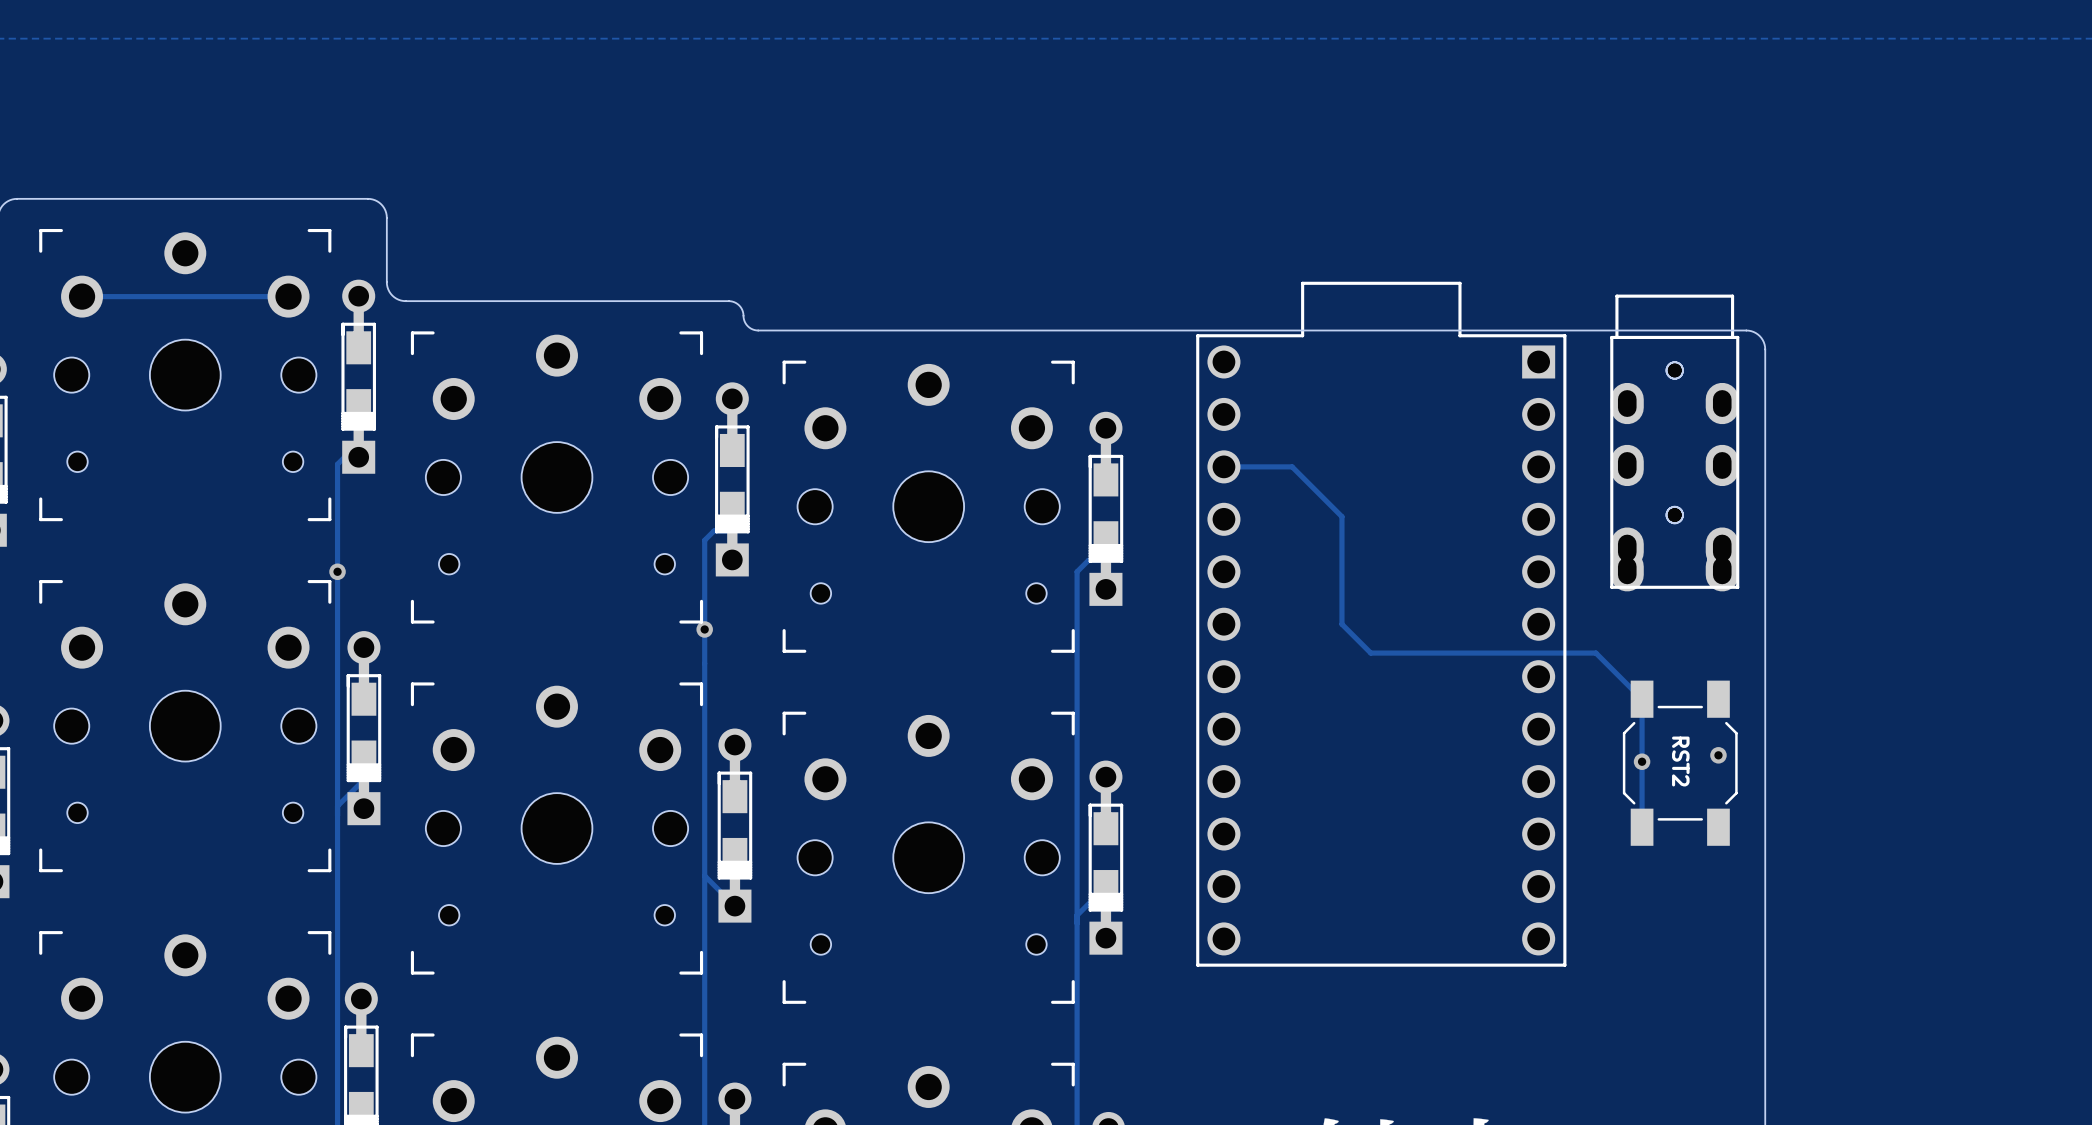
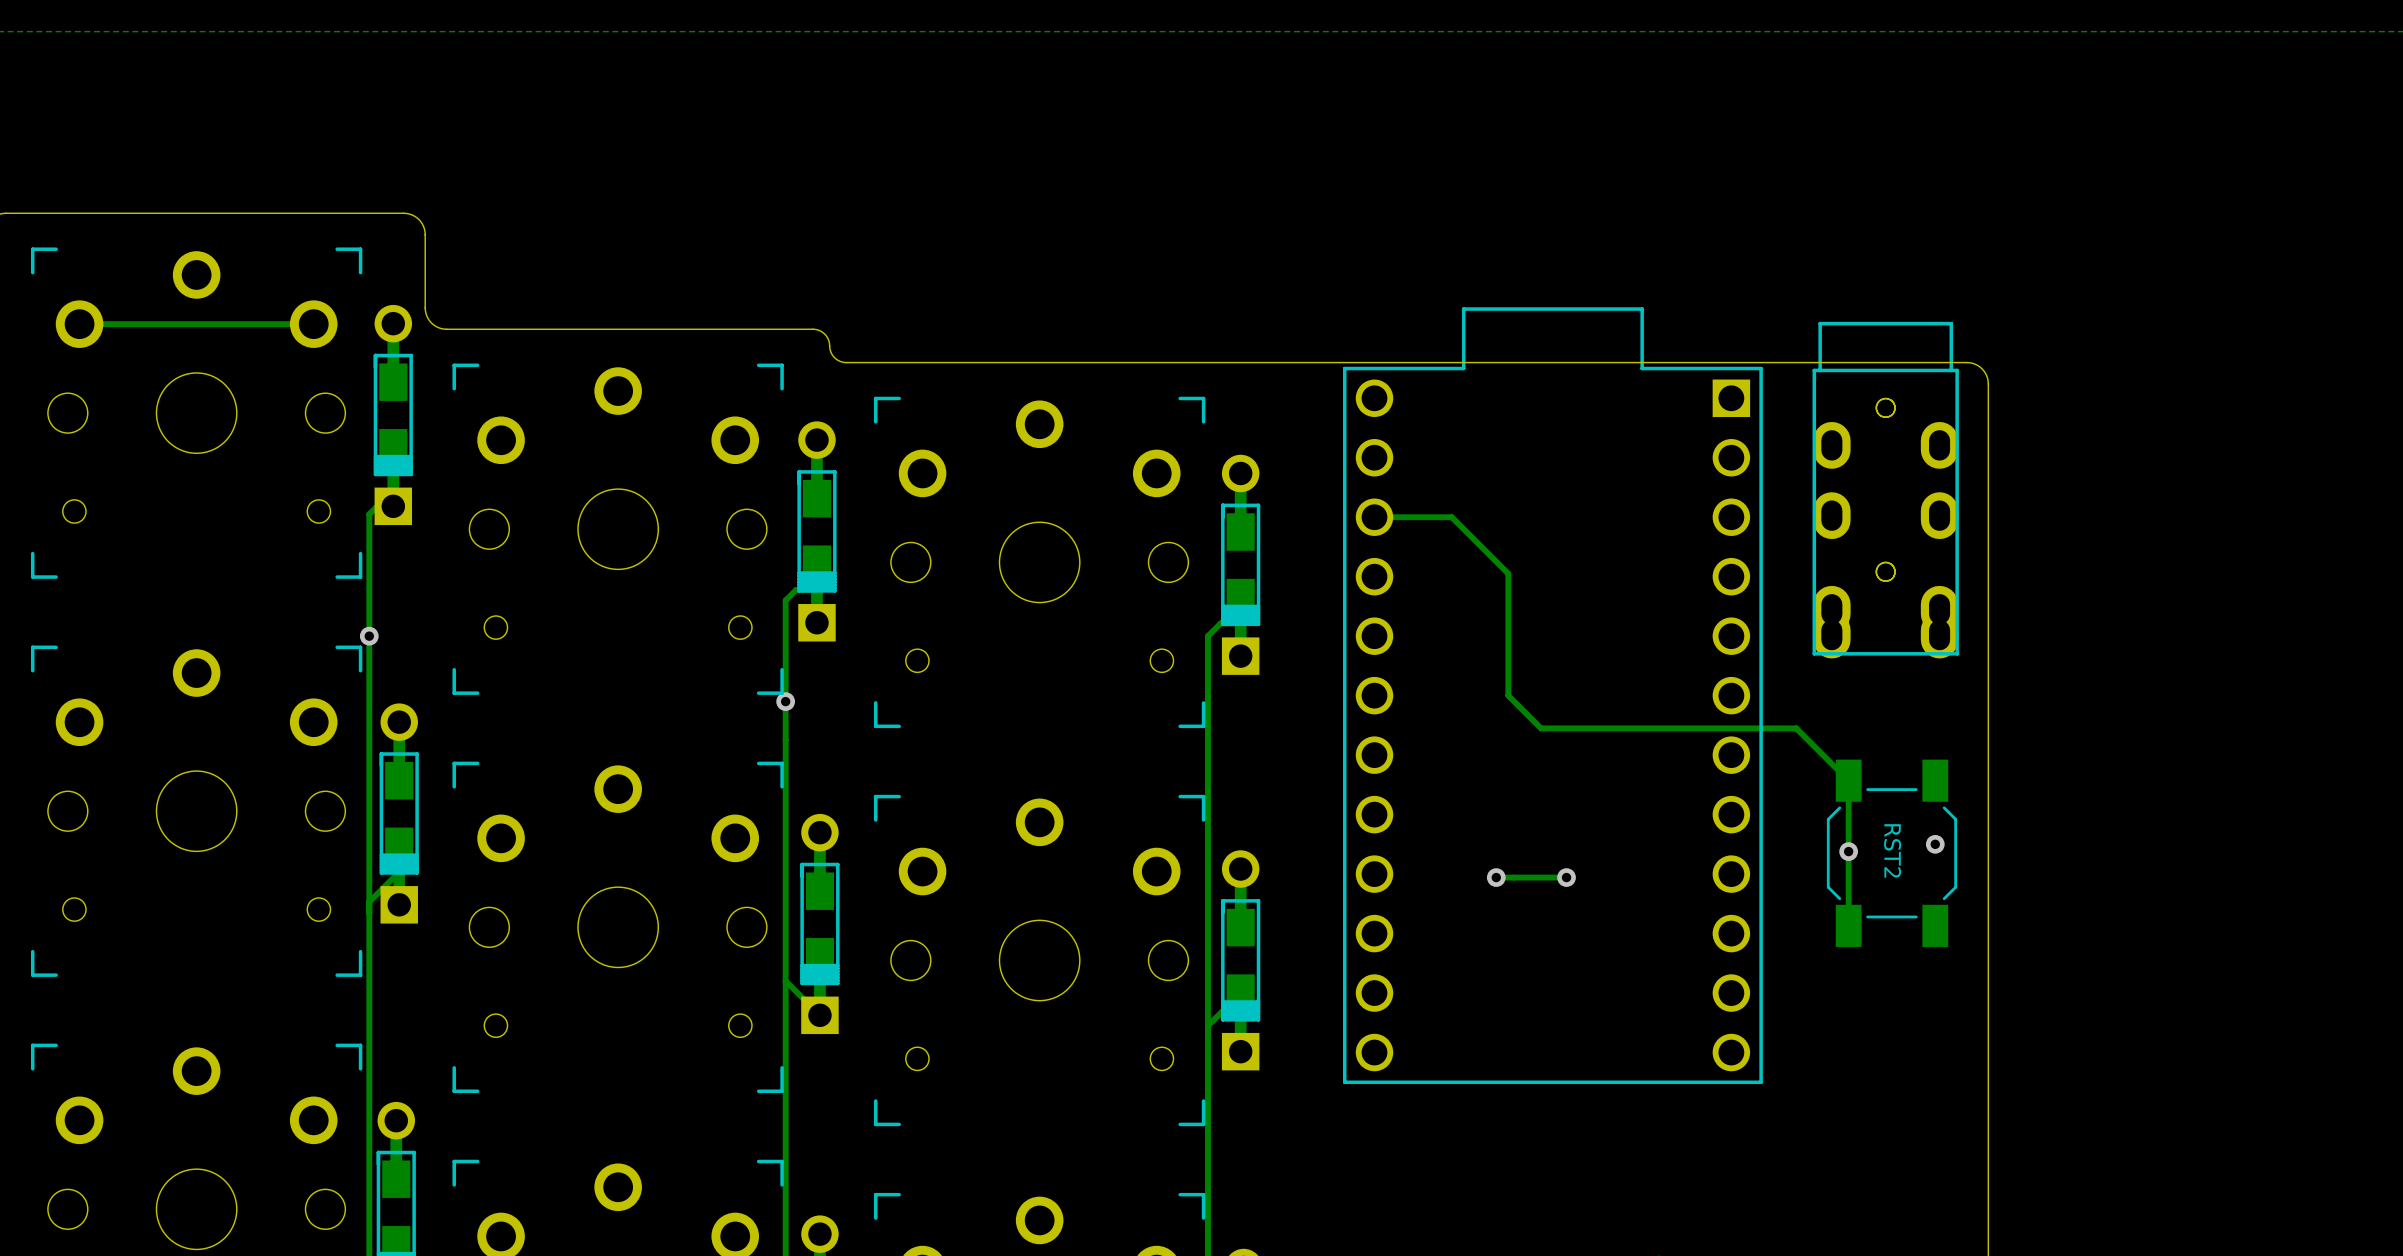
via: none -> (1496, 877)
track: none -> (1566, 877) (1496, 877)
via: none -> (1566, 877)

